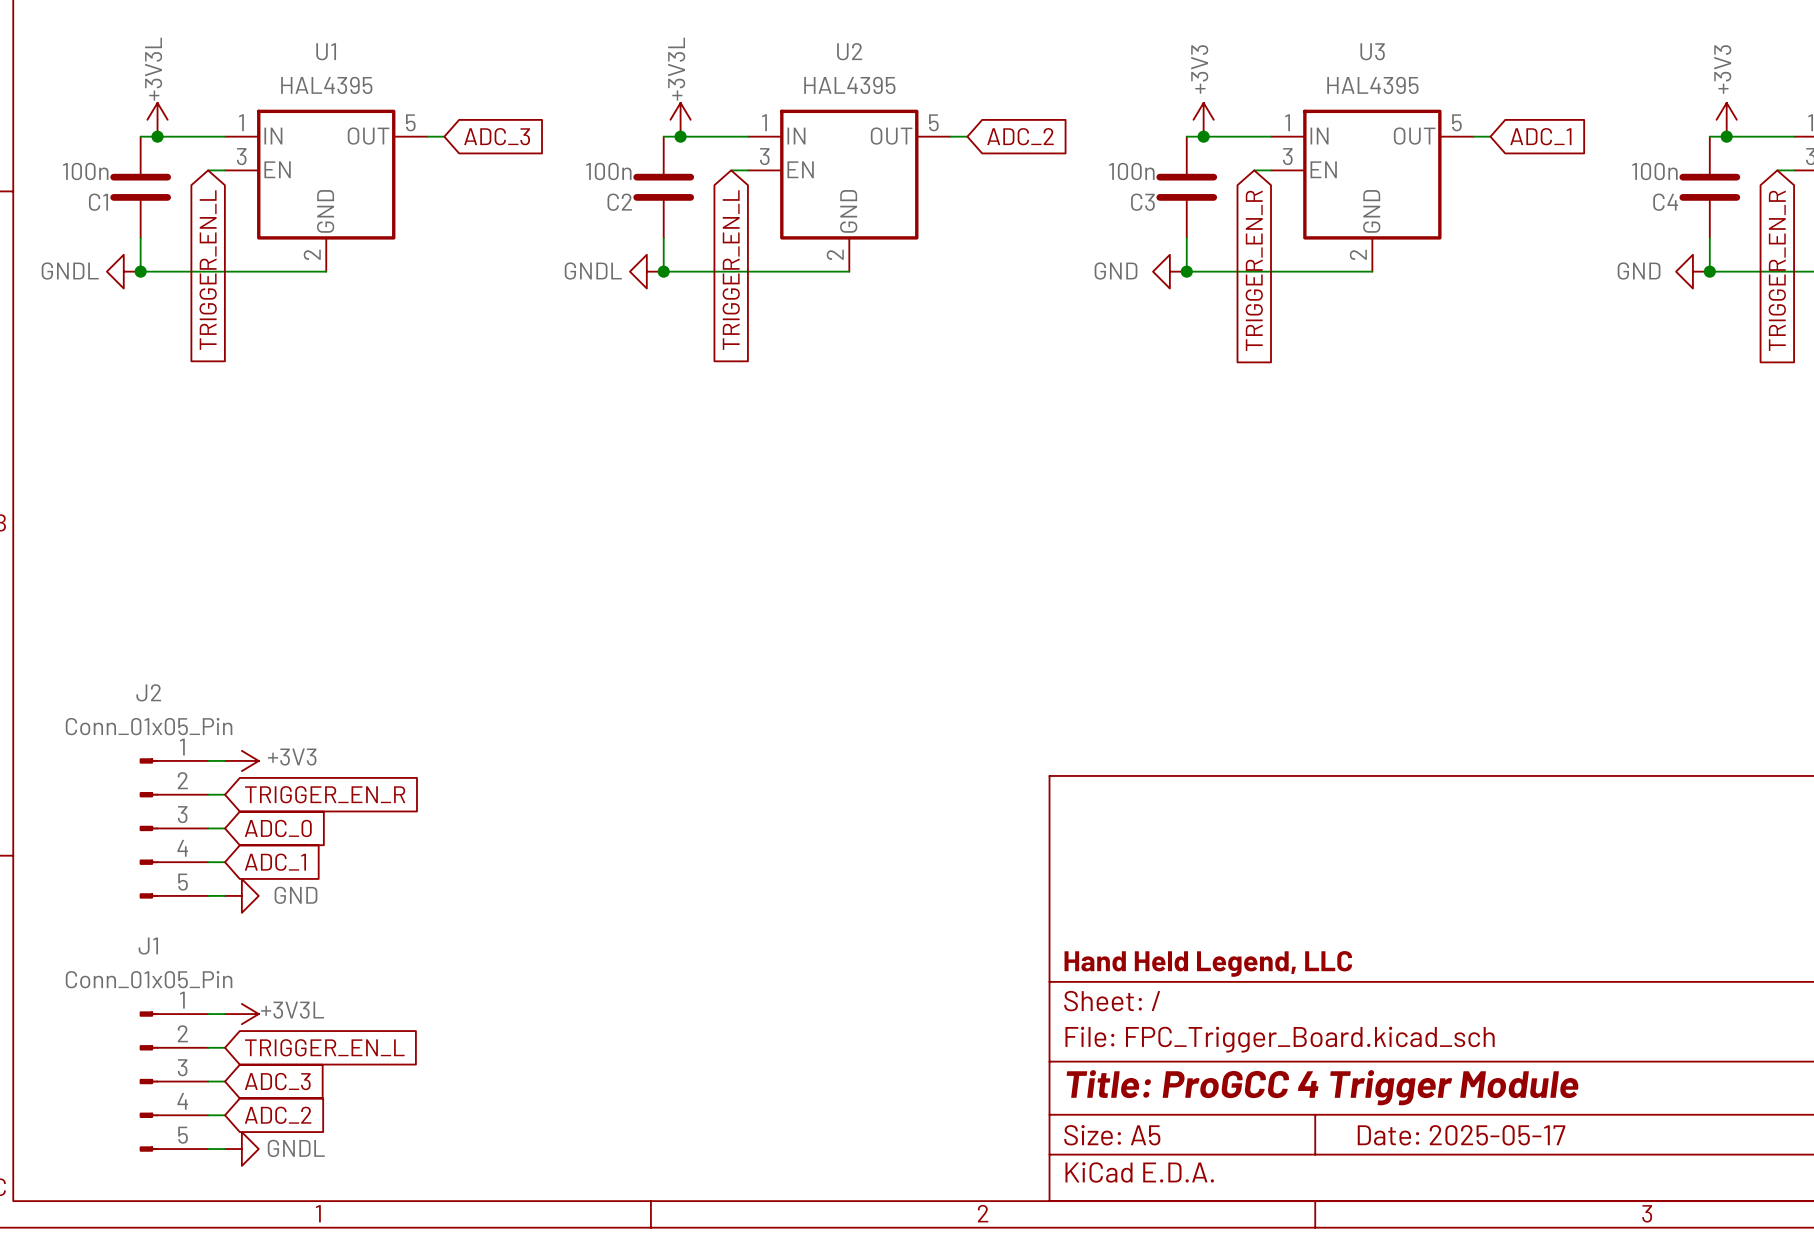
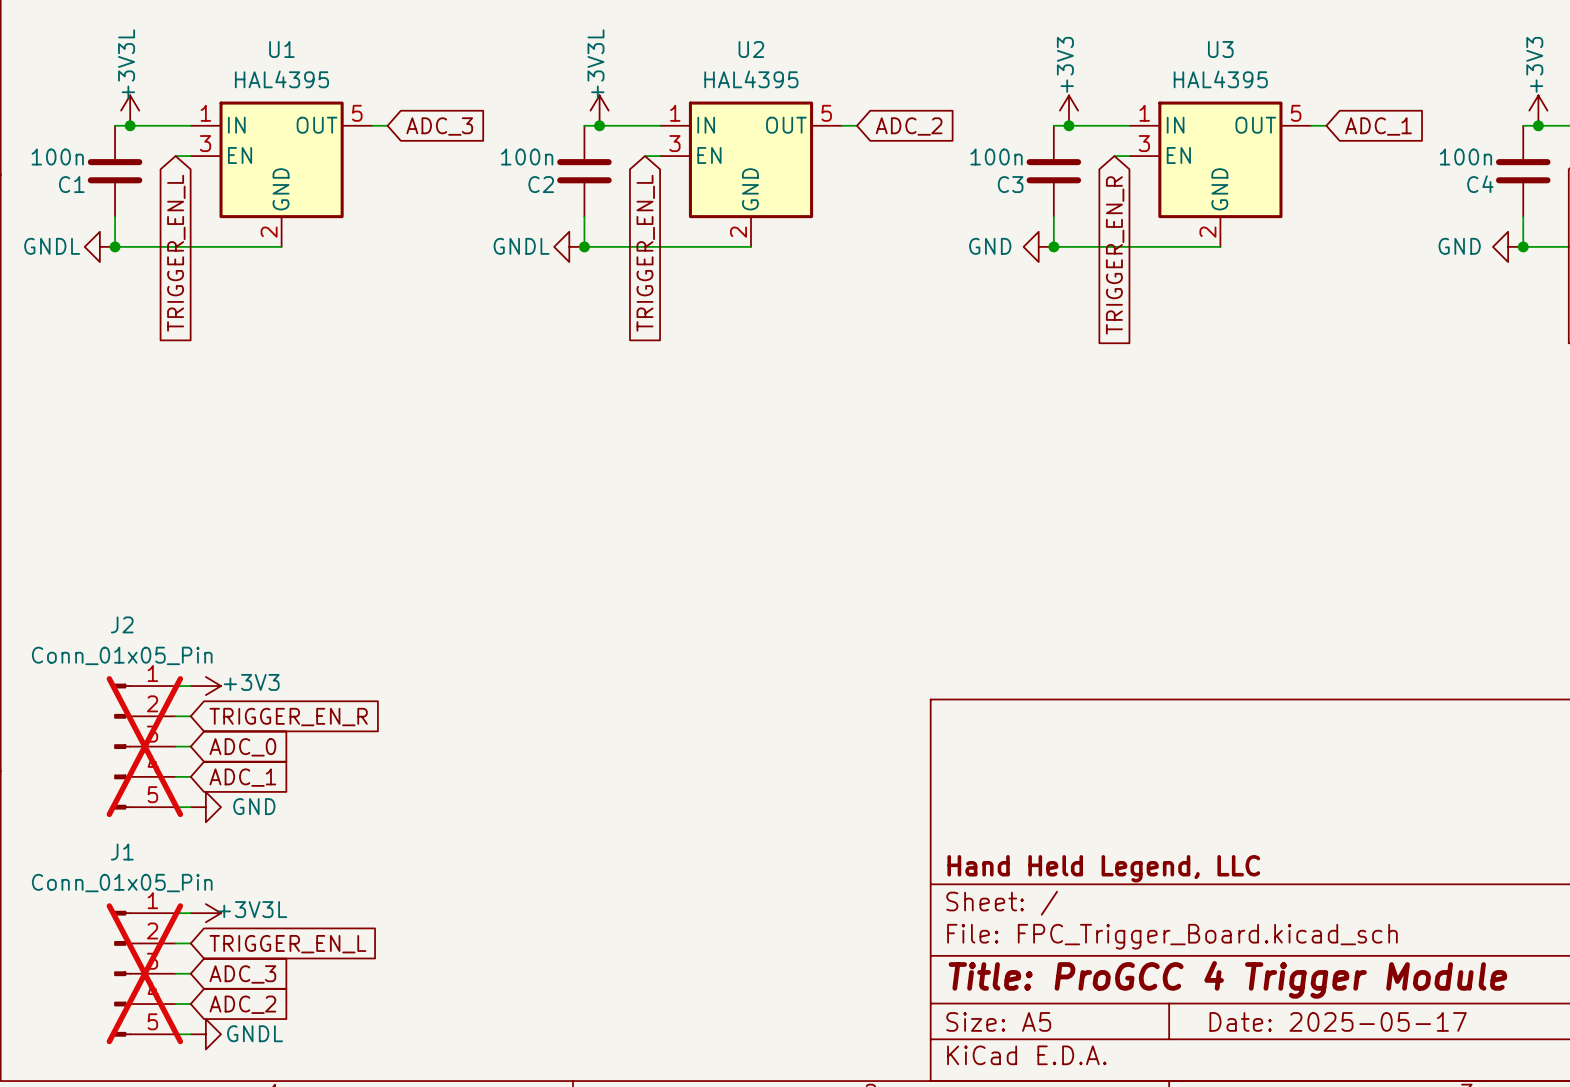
J2 do-not-place cross: none -> (144, 746)
J1 do-not-place cross: none -> (144, 973)

